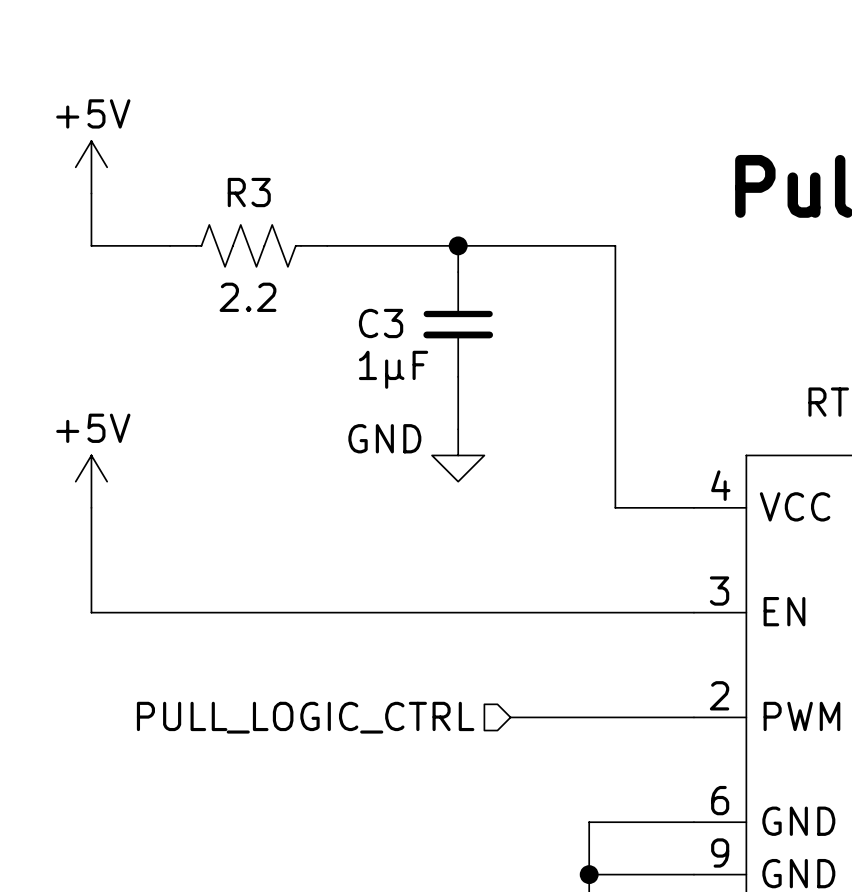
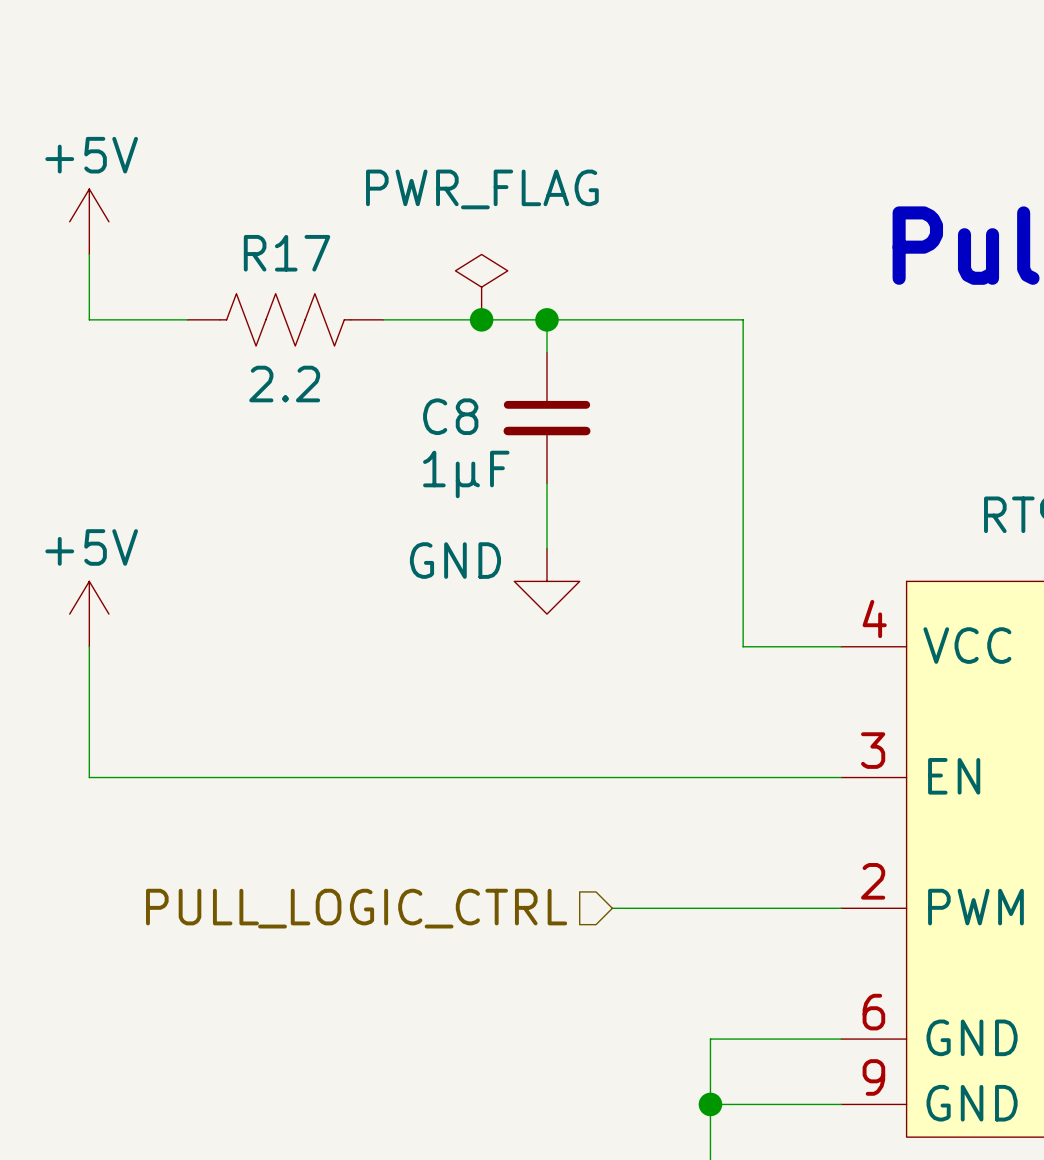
R3 name: R3 (249, 192) -> R17 (287, 253)
power symbol: none -> PWR_FLAG (481, 287)
junction: none -> (481, 319)
C3 name: C3 (381, 323) -> C8 (450, 416)

